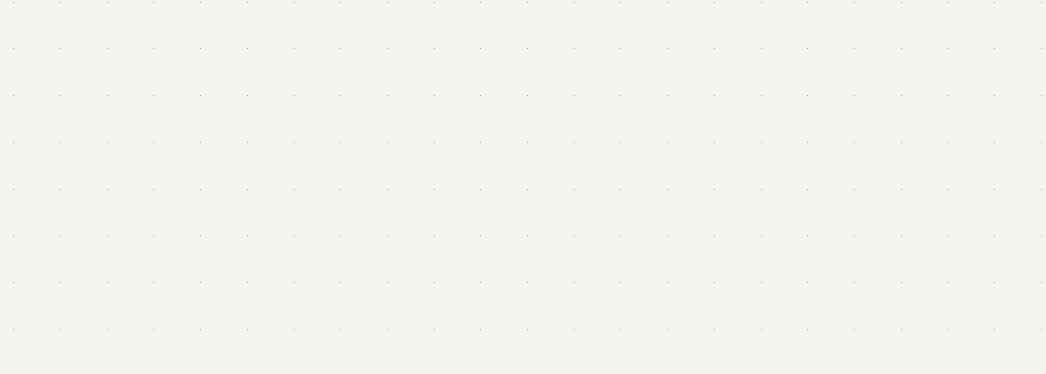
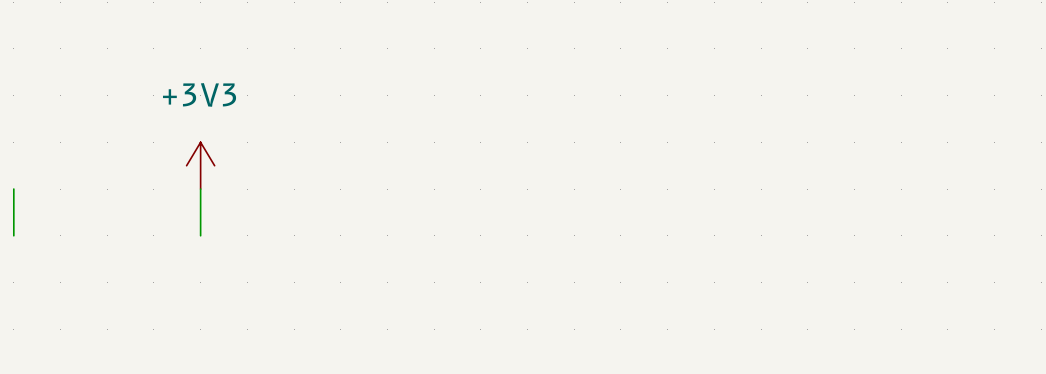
power symbol: none -> +3V3 (200, 165)
wire: none -> (13, 189) (13, 235)
wire: none -> (200, 189) (200, 235)

